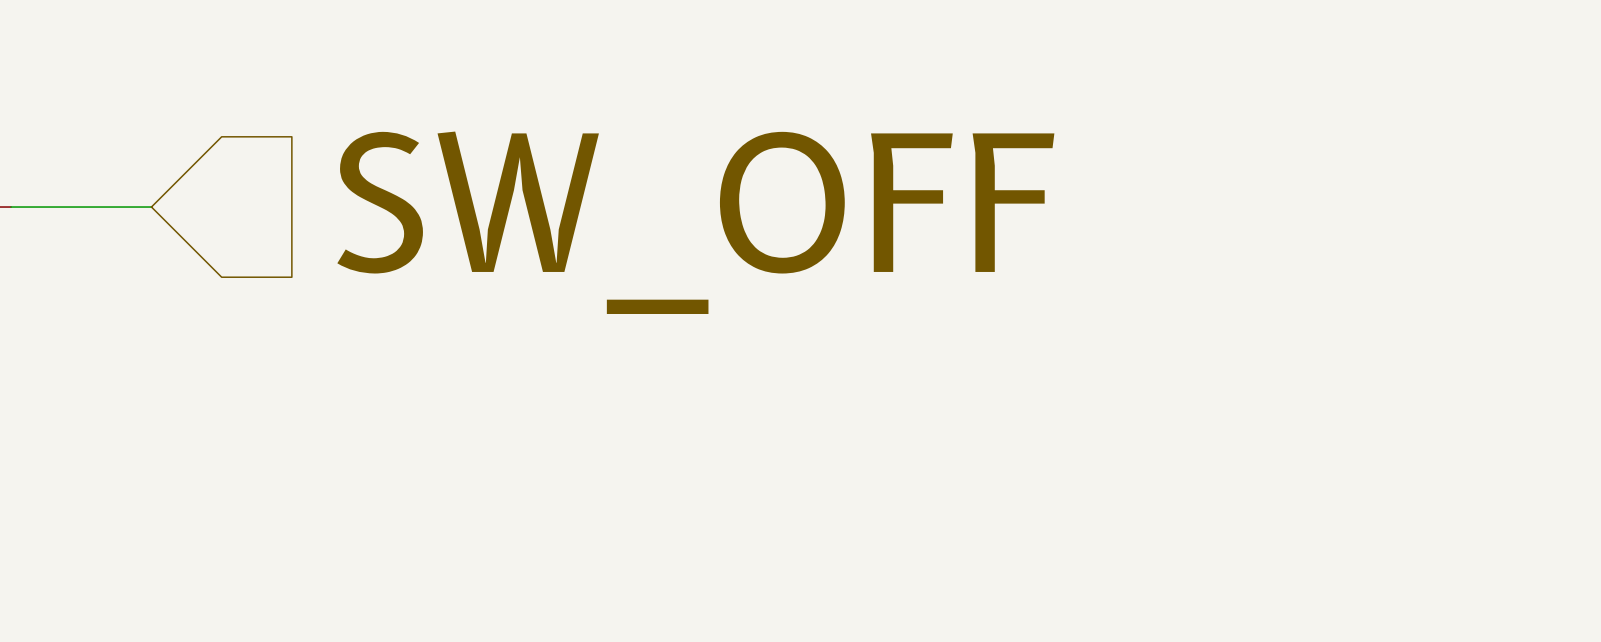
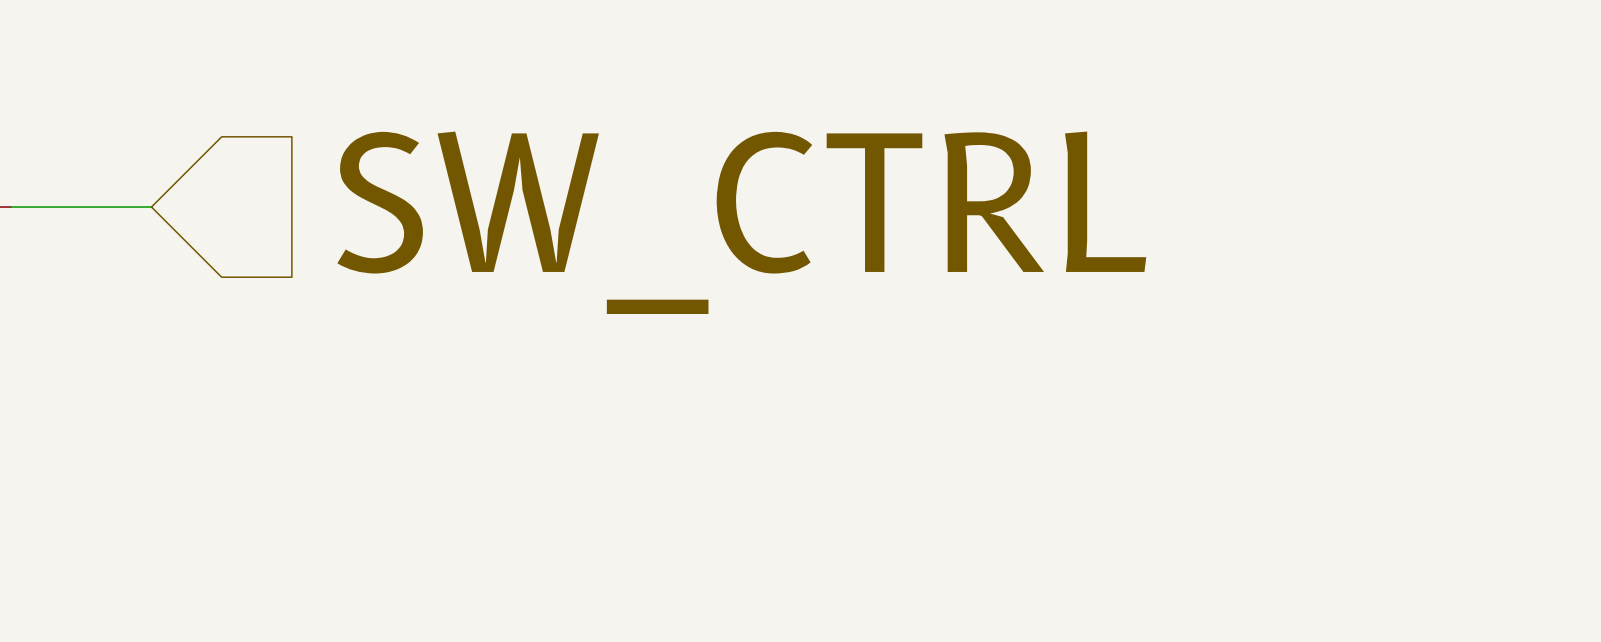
hierarchical label: SW_OFF (695, 222) -> SW_CTRL (741, 222)

